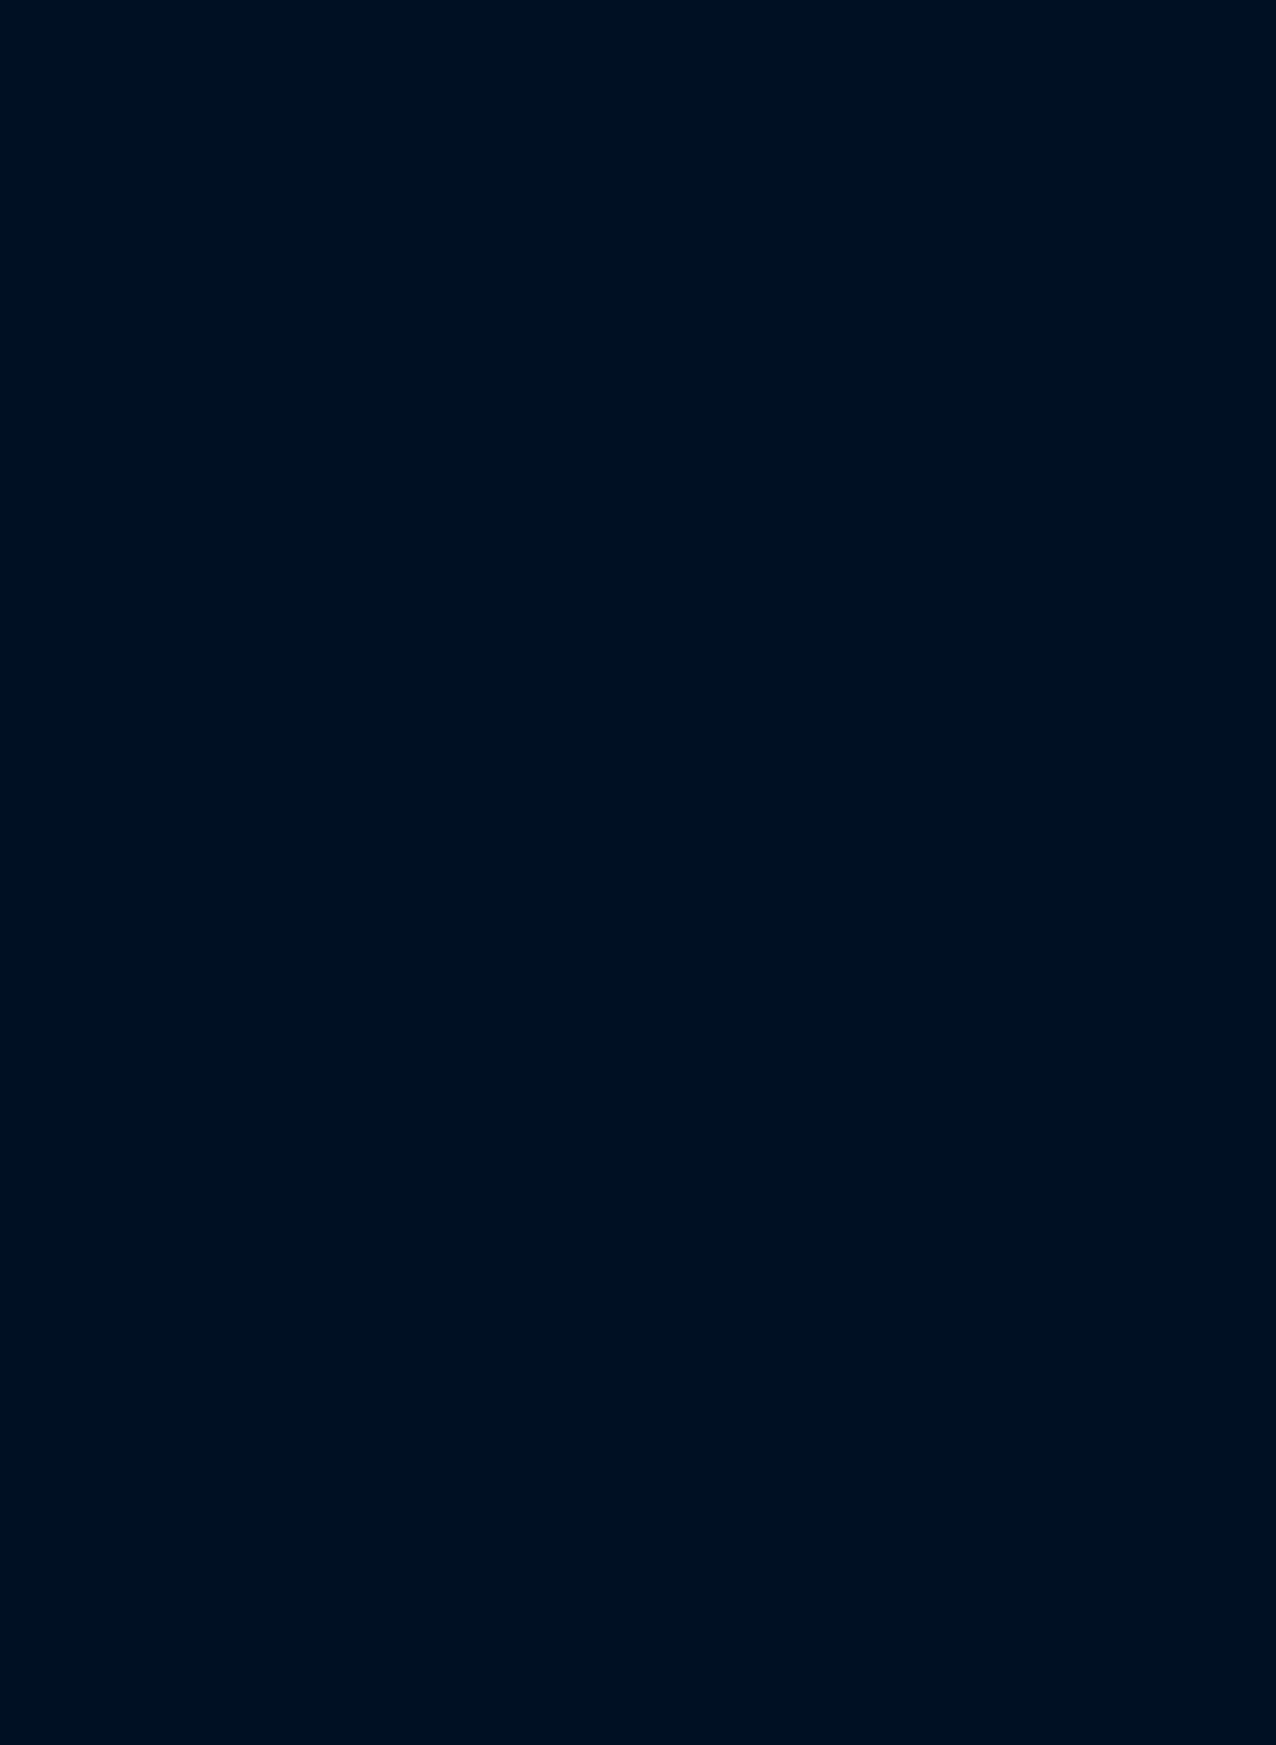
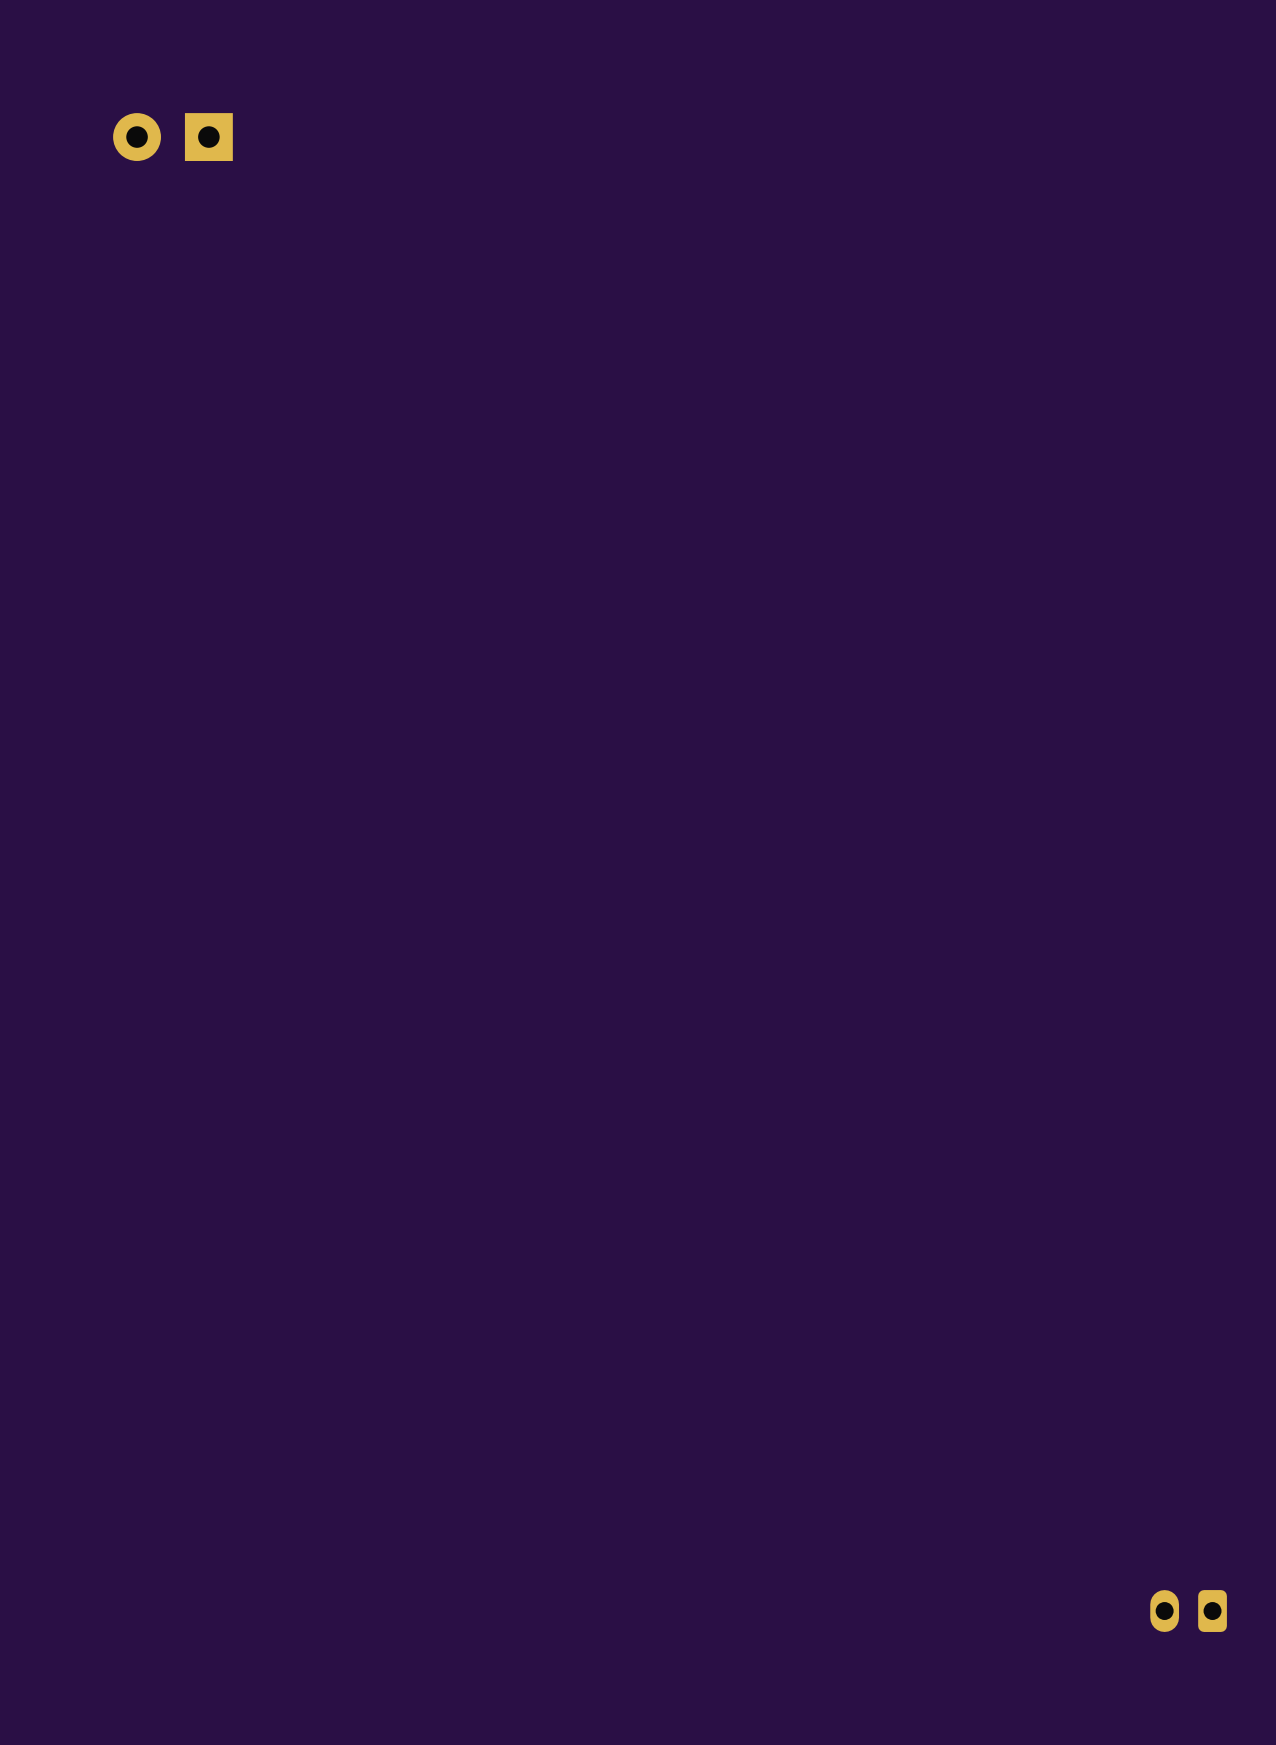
part: none -> (172, 137)
part: none -> (1188, 1611)

